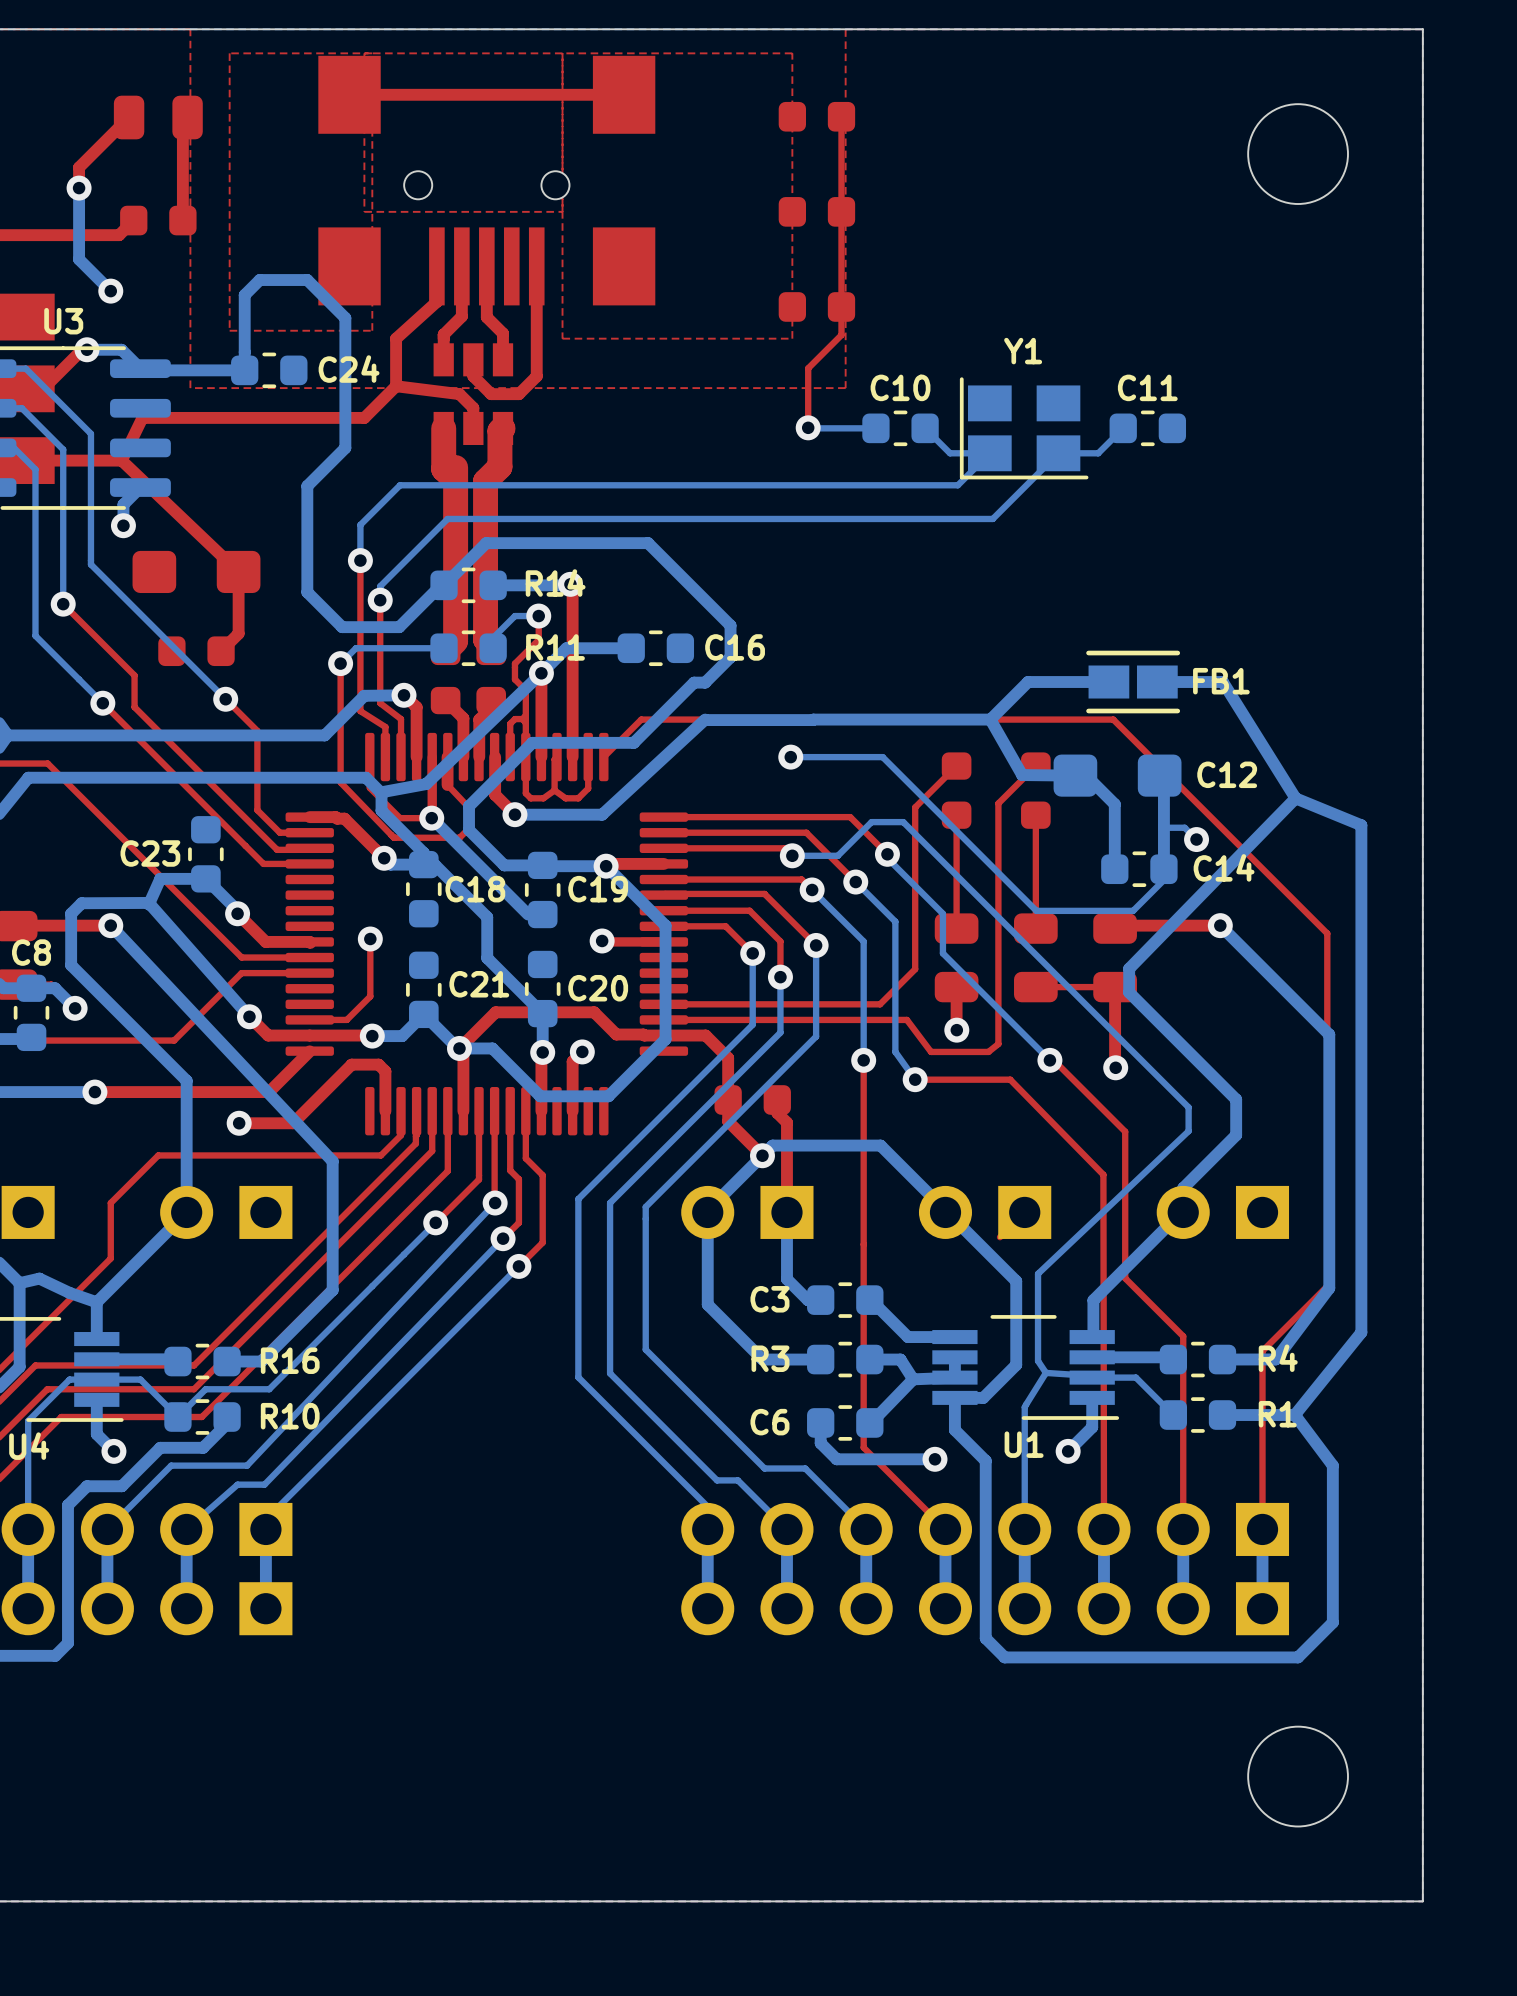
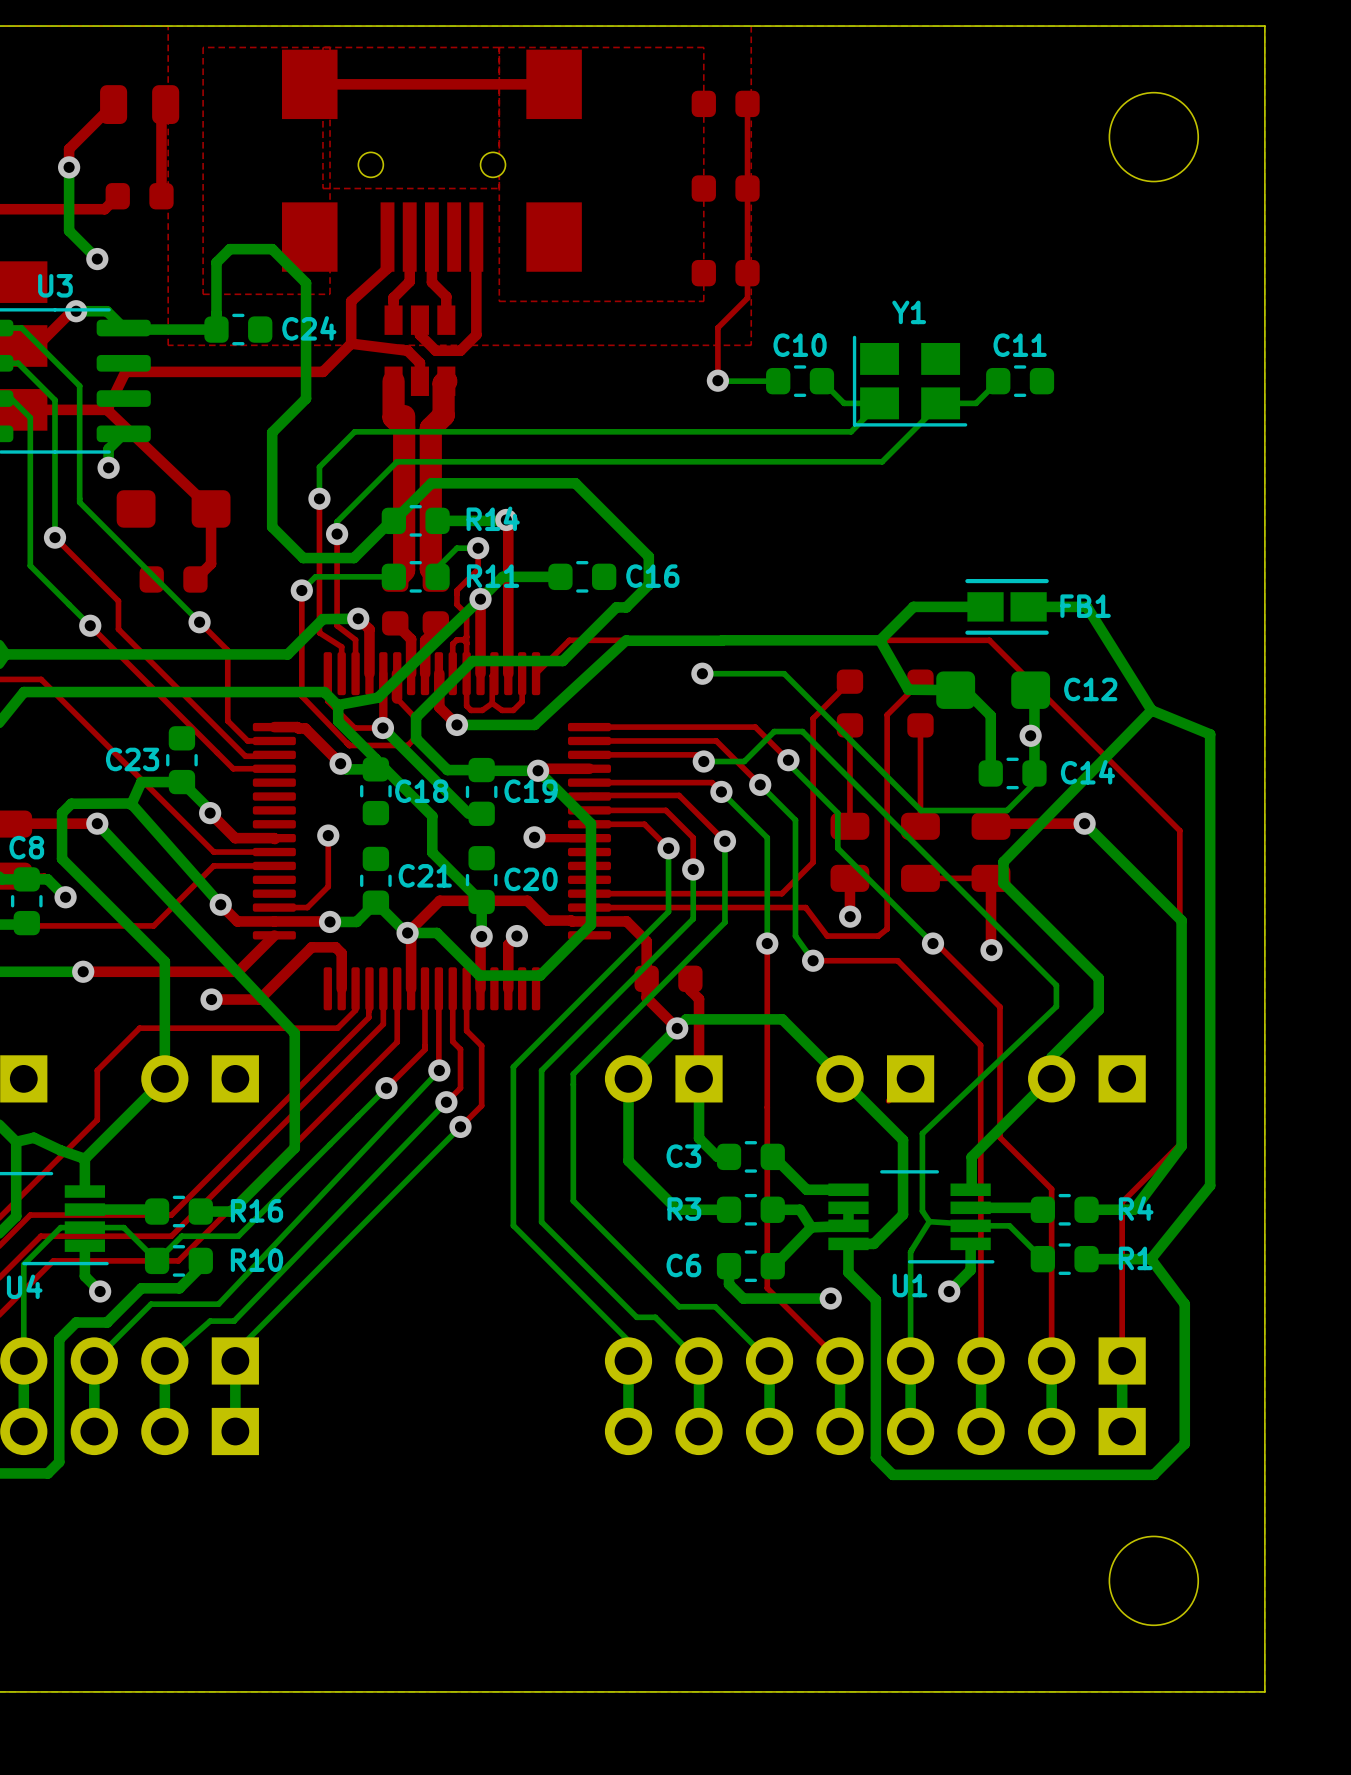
bottom track: (1163, 827) (1184, 827) (1196, 839) -> none
via position: (1196, 839) -> (1030, 735)

